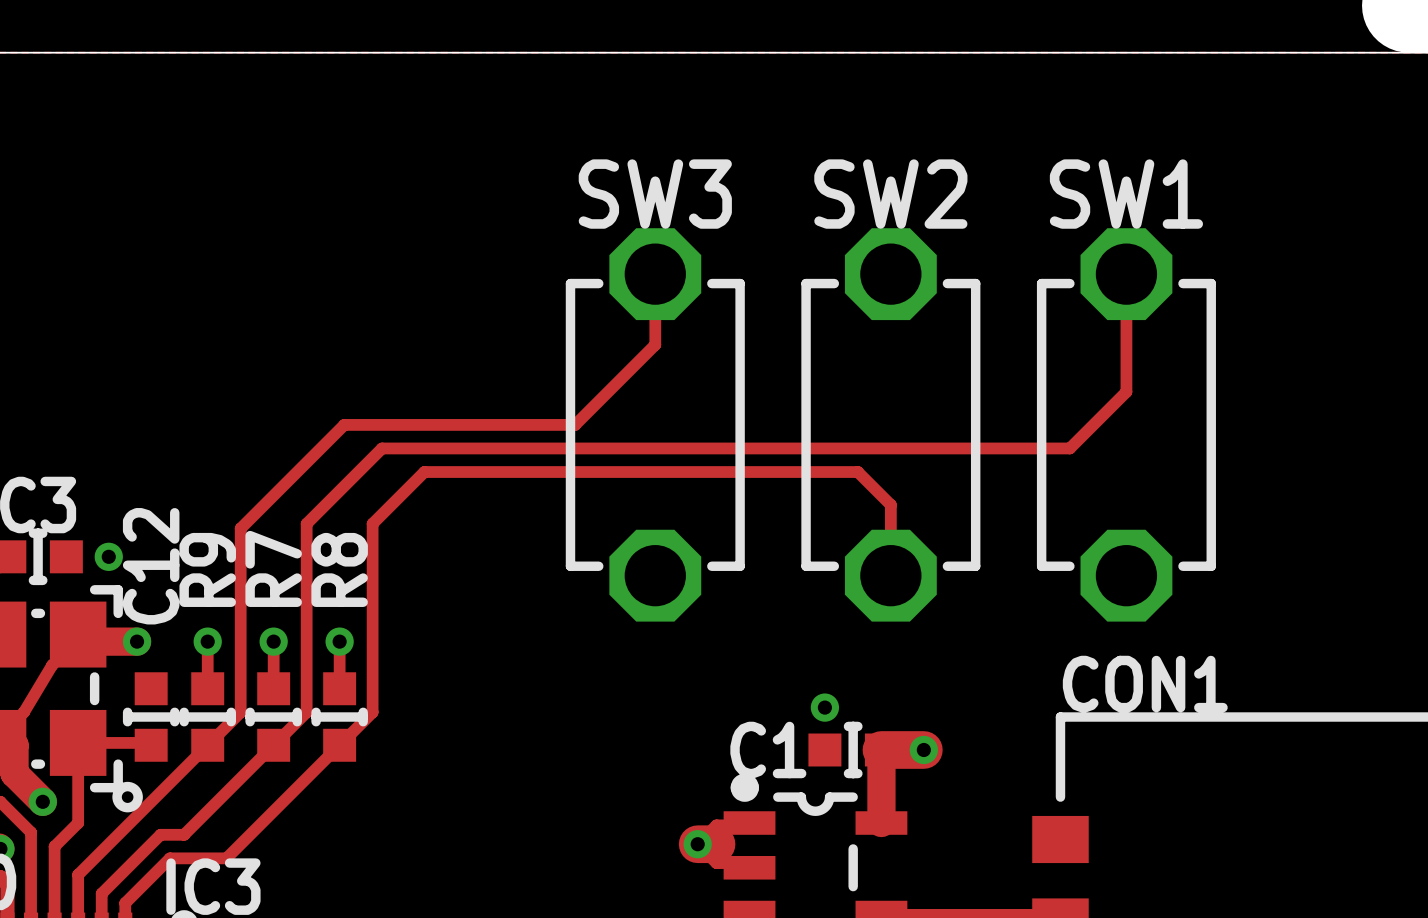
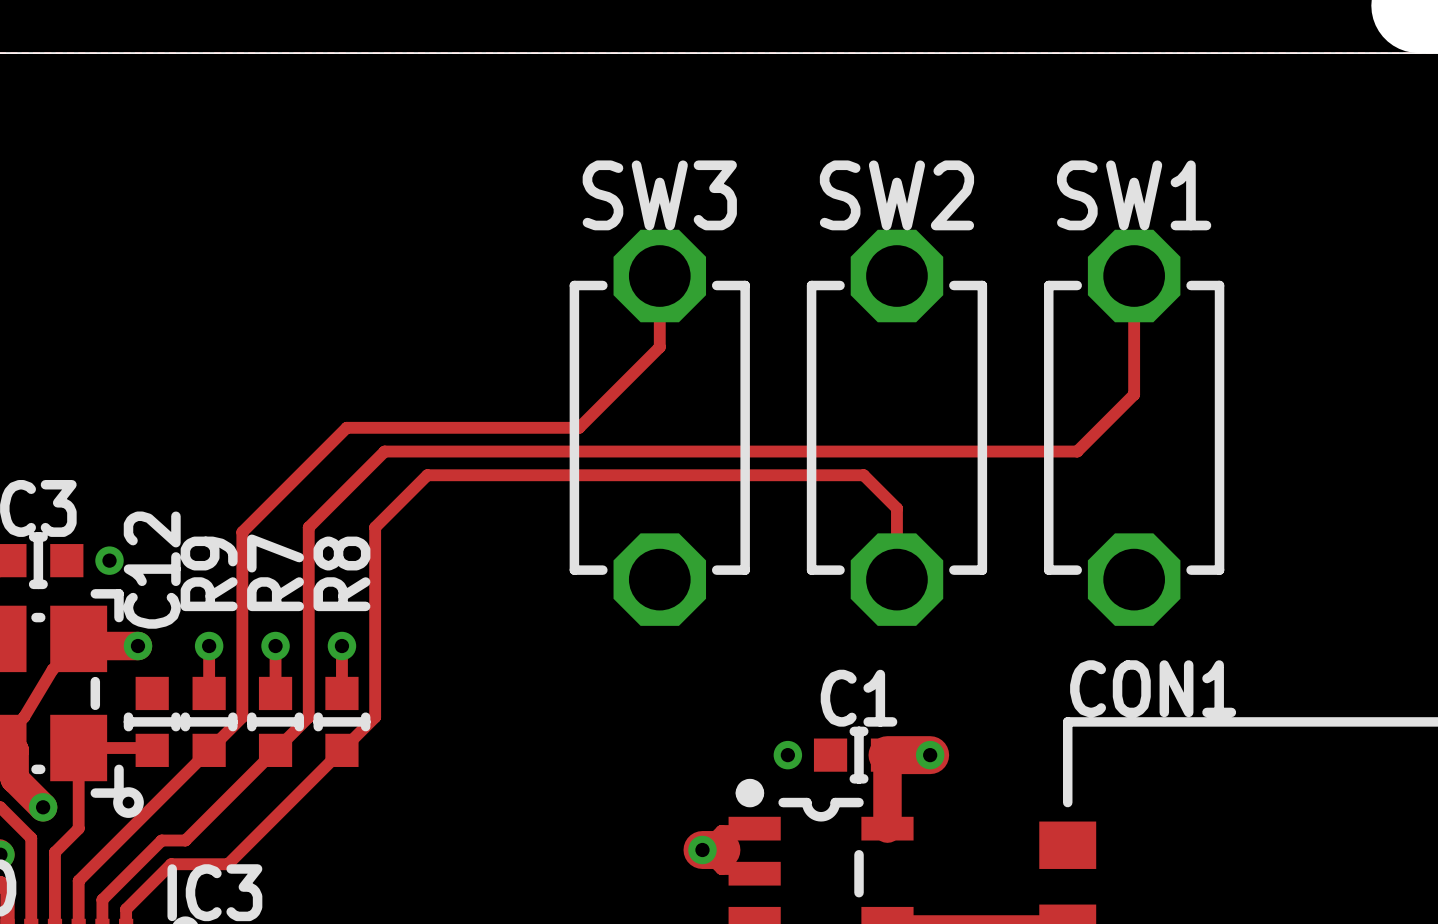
via position: (824, 707) -> (787, 755)
C1 name position: C1 (768, 749) -> C1 (859, 698)

